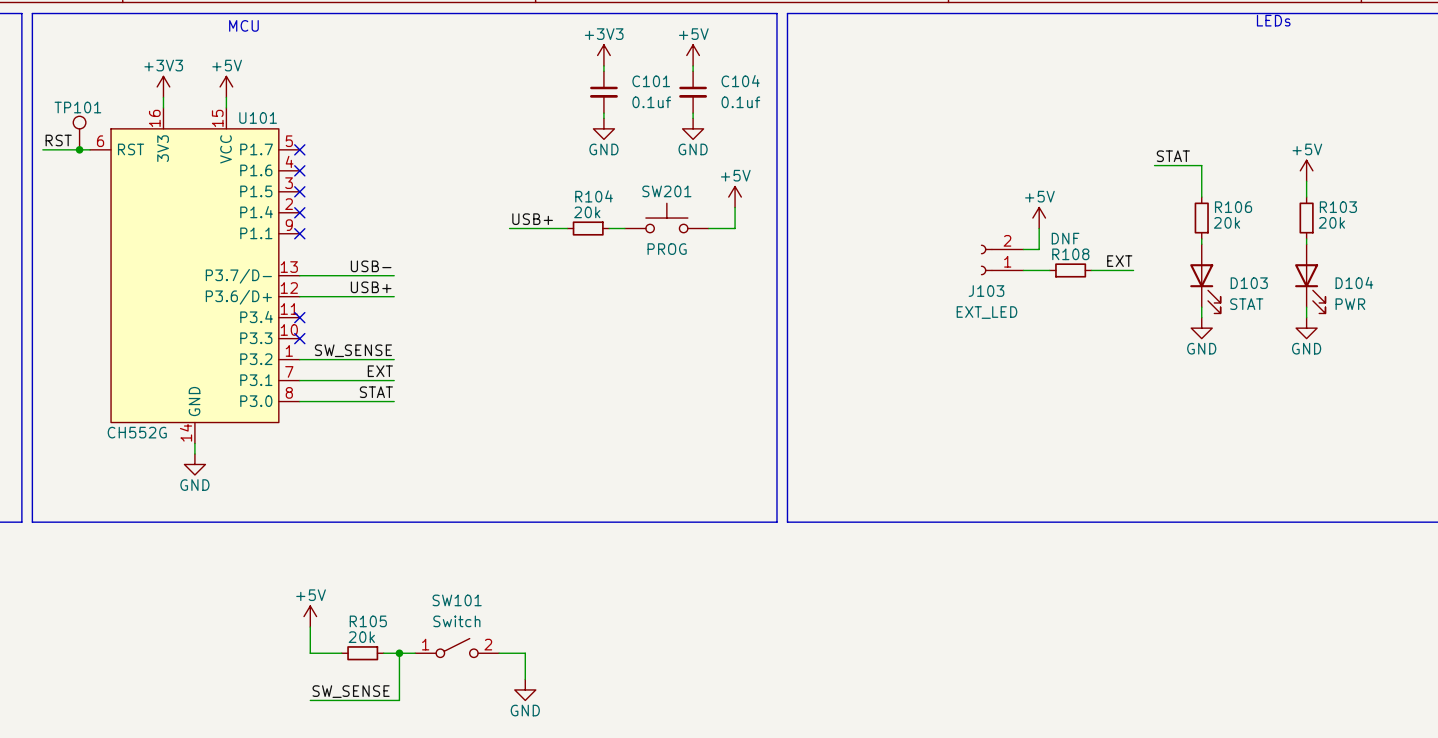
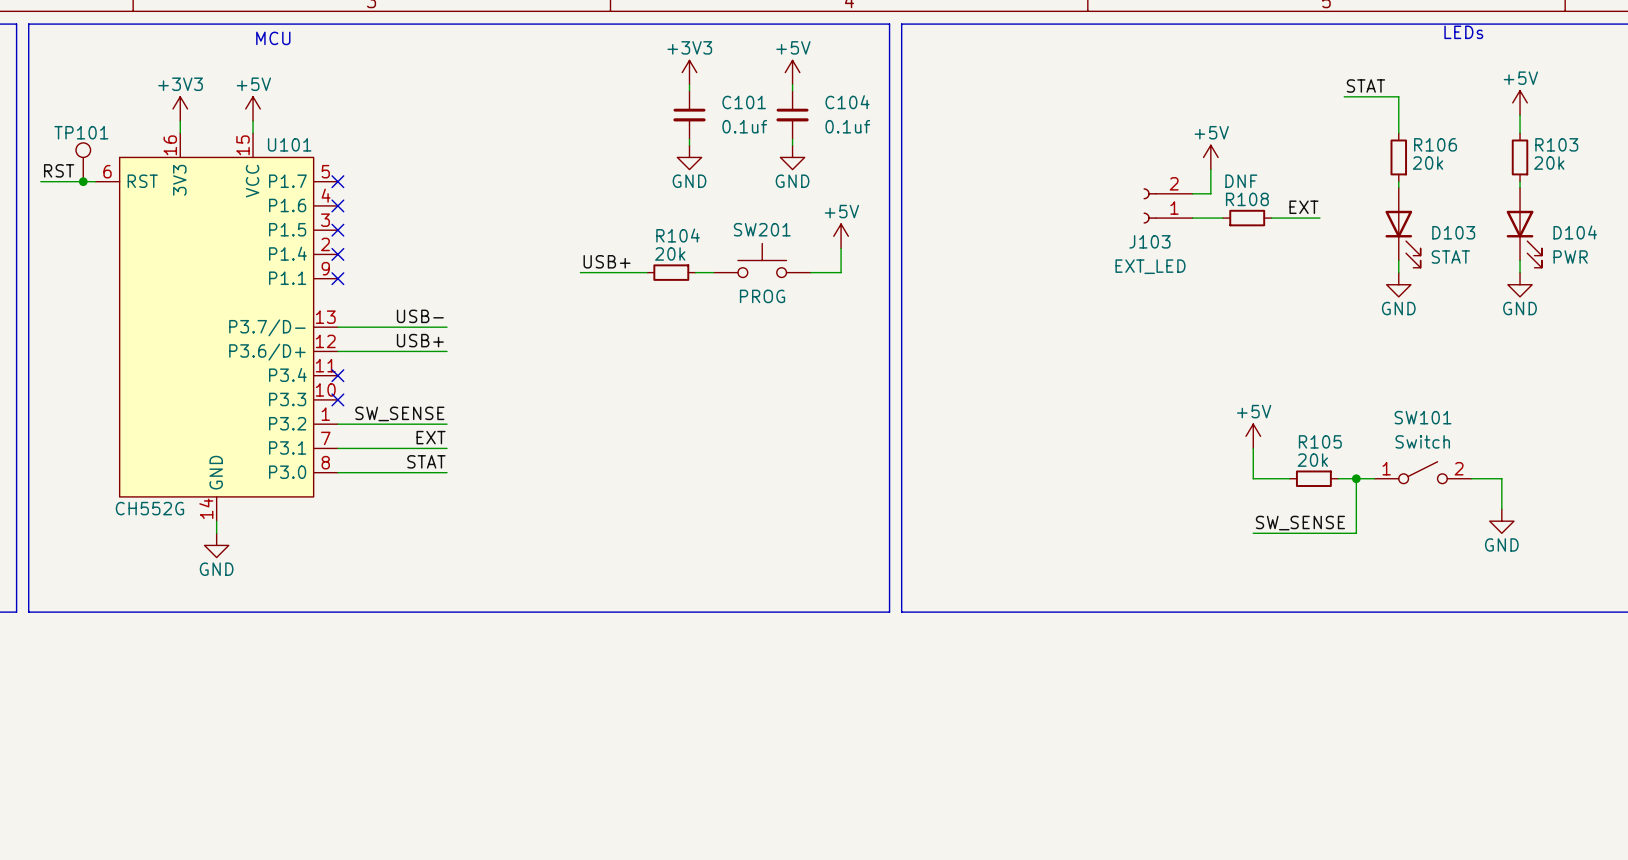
power symbol: none -> +5V (1210, 157)
label position: STAT (1173, 156) -> STAT (1365, 86)
wire: (1154, 165) (1201, 165) (1201, 197) -> (1344, 96) (1398, 96) (1398, 133)
power symbol position: +5V (1306, 170) -> +5V (1520, 102)
wire: (1306, 181) (1306, 197) -> (1520, 115) (1520, 133)
power symbol: +5V (1039, 218) -> none
R106 position: (1201, 218) -> (1398, 157)
R103 position: (1306, 218) -> (1520, 157)
wire: (1039, 228) (1039, 249) (1023, 249) -> (1210, 169) (1210, 193) (1192, 193)
wire: (1201, 239) (1201, 244) -> (1398, 181) (1398, 187)
power symbol: none -> GND (1398, 284)
wire: (1306, 239) (1306, 244) -> (1520, 181) (1520, 187)
power symbol: none -> GND (1520, 284)
J103 position: (1002, 259) -> (1168, 205)
label position: EXT (1119, 261) -> EXT (1303, 207)
wire: (1023, 270) (1049, 270) -> (1192, 218) (1222, 218)
R108 position: (1070, 270) -> (1247, 218)
wire: (1091, 270) (1133, 270) -> (1271, 218) (1319, 218)
D103 position: (1205, 278) -> (1403, 227)
D104 position: (1310, 278) -> (1524, 227)
wire: (1201, 307) (1201, 317) -> (1398, 260) (1398, 272)
wire: (1306, 307) (1306, 317) -> (1520, 260) (1520, 272)
power symbol: GND (1201, 328) -> none
power symbol: GND (1306, 328) -> none
power symbol: none -> +5V (1253, 436)
wire: none -> (1253, 448) (1253, 478) (1289, 478)
wire: none -> (1338, 478) (1374, 478)
wire: none -> (1356, 478) (1356, 533) (1253, 533)
junction: none -> (1356, 478)
wire: none -> (1471, 478) (1501, 478) (1501, 509)
power symbol: none -> GND (1501, 521)
label: none -> SW_SENSE (1300, 523)
power symbol: +5V (310, 616) -> none
wire: (310, 627) (310, 653) (341, 653) -> none
SW101 position: (457, 648) -> (1423, 472)
R105 position: (362, 653) -> (1313, 478)
wire: (383, 653) (415, 653) -> none
wire: (399, 653) (399, 700) (310, 700) -> none
junction: (399, 653) -> none
wire: (499, 653) (525, 653) (525, 679) -> none
power symbol: GND (525, 689) -> none
label: SW_SENSE (351, 691) -> none

